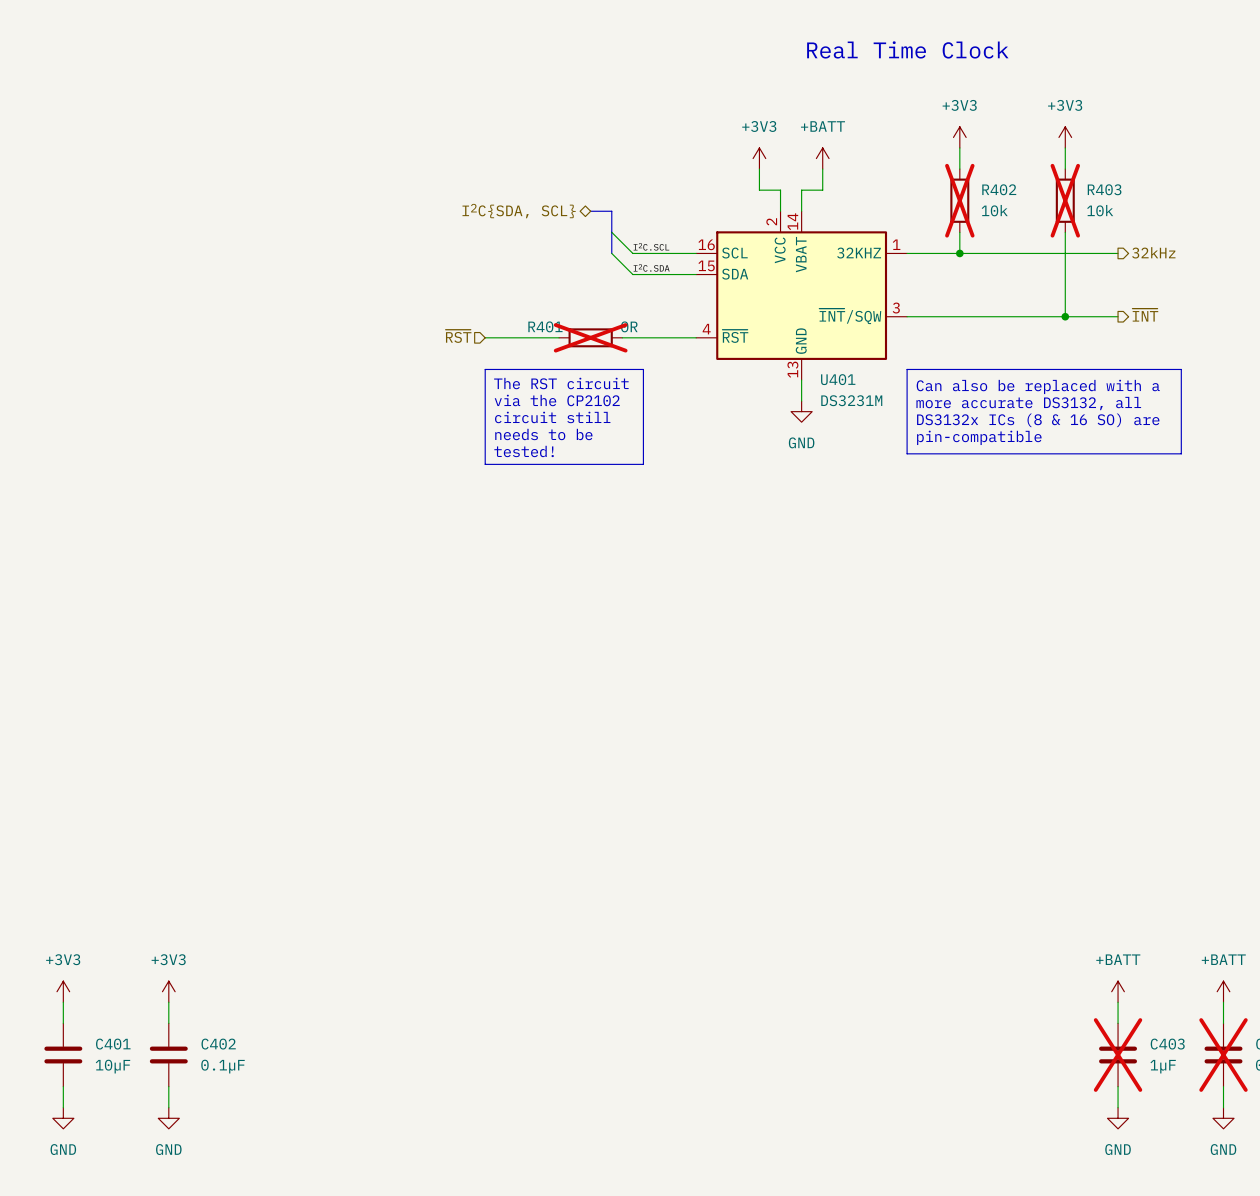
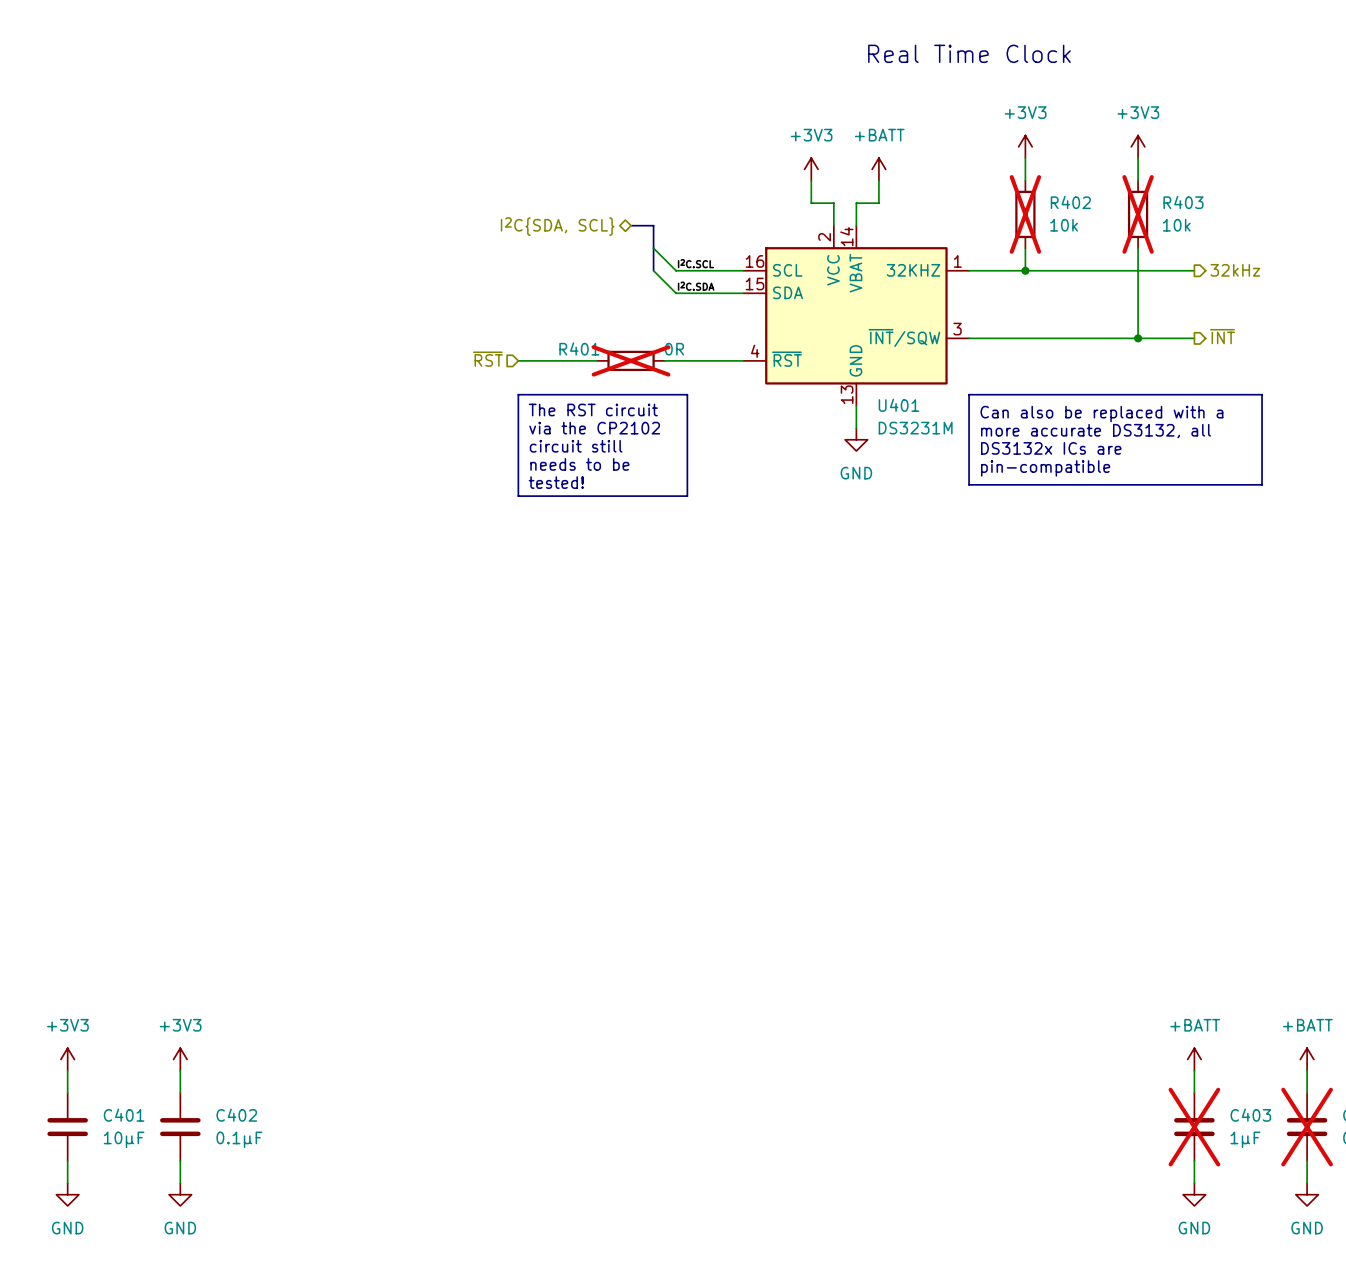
text: DS3132x ICs (8 & 16 SO) are (1038, 420) -> DS3132x ICs are (1051, 448)

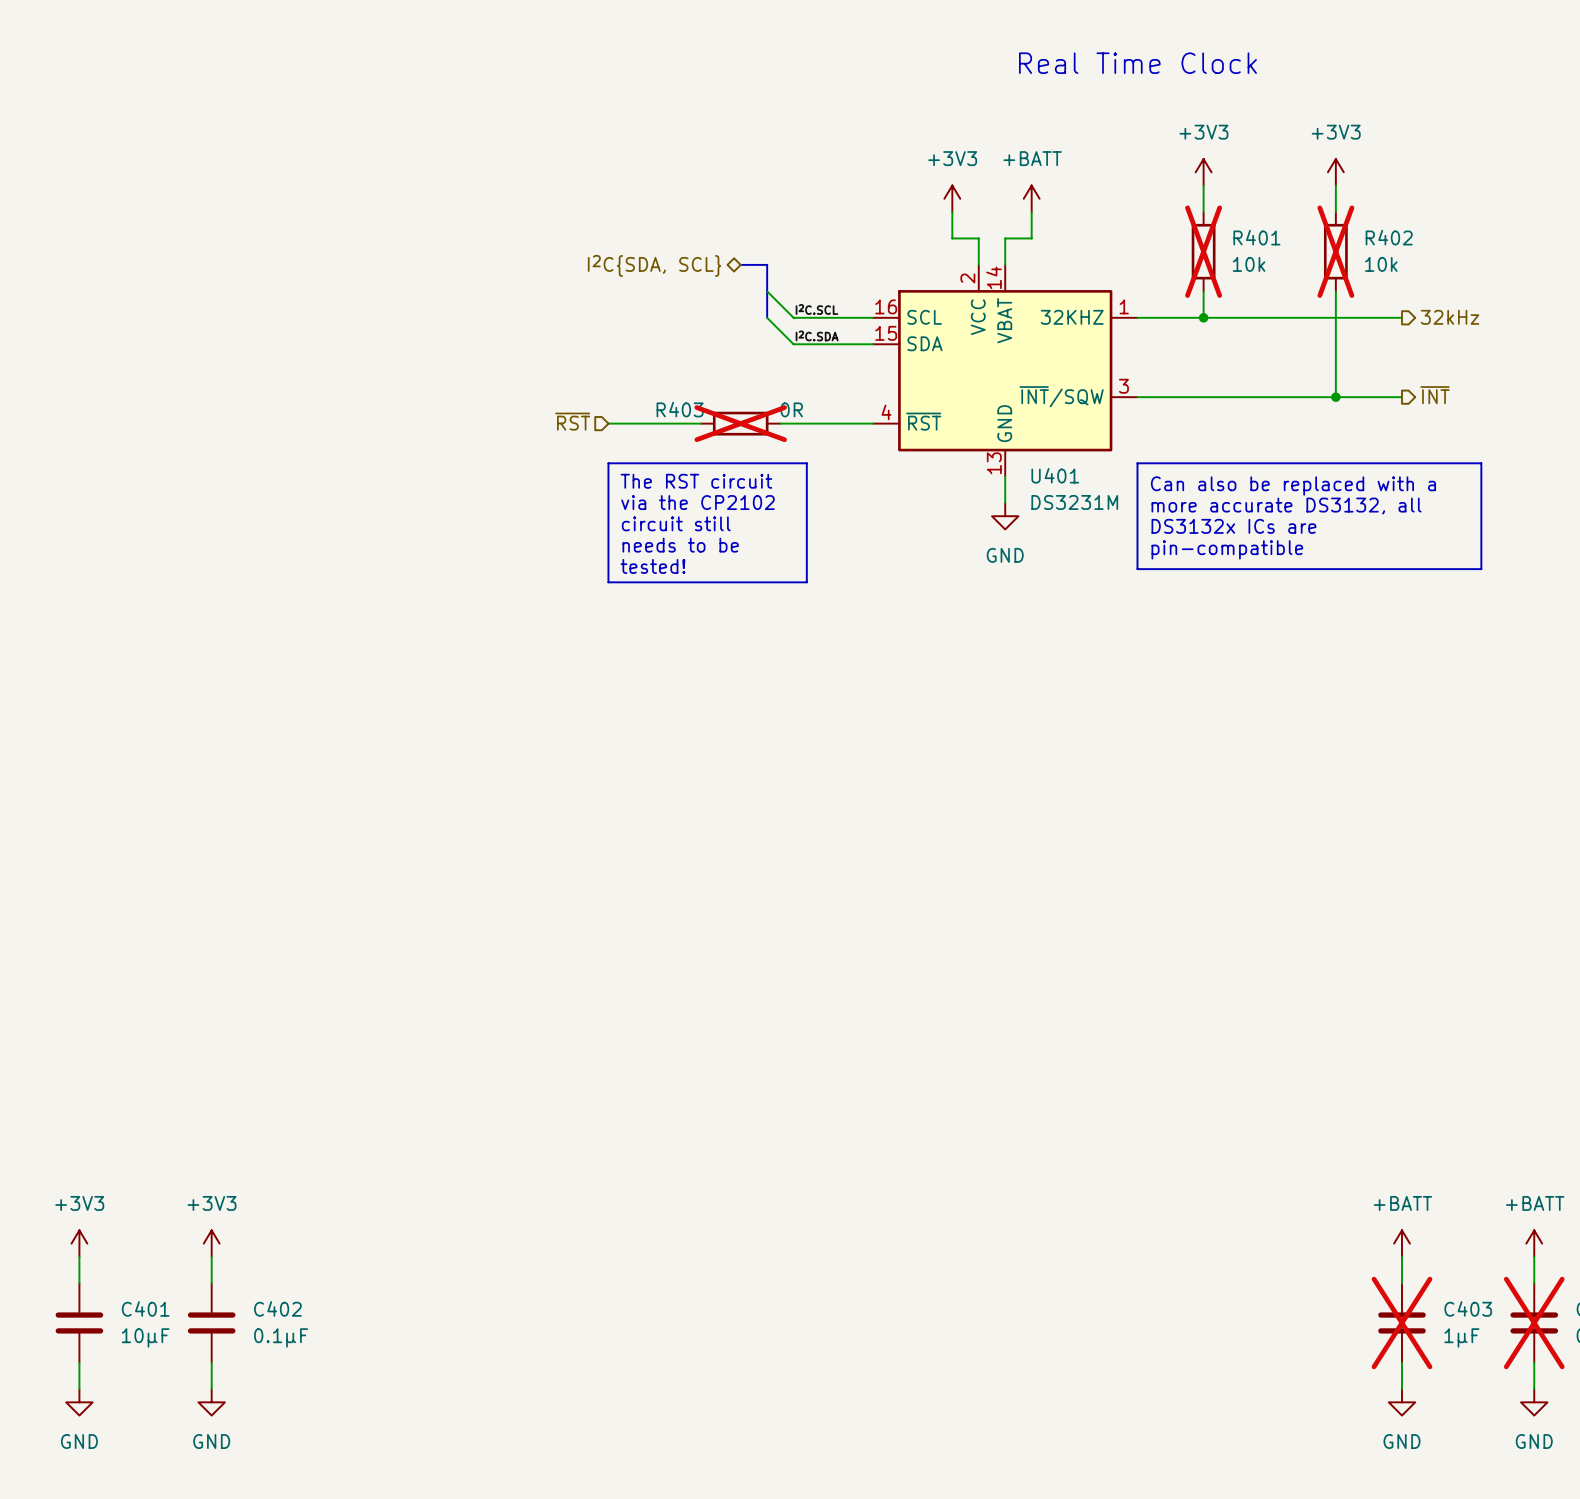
R402 name: R402 (1070, 202) -> R401 (1256, 237)
R403 name: R403 (1183, 202) -> R402 (1389, 237)
R401 name: R401 (579, 348) -> R403 (680, 409)

